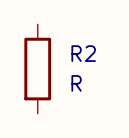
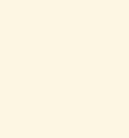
R2: R (37, 69) -> none

